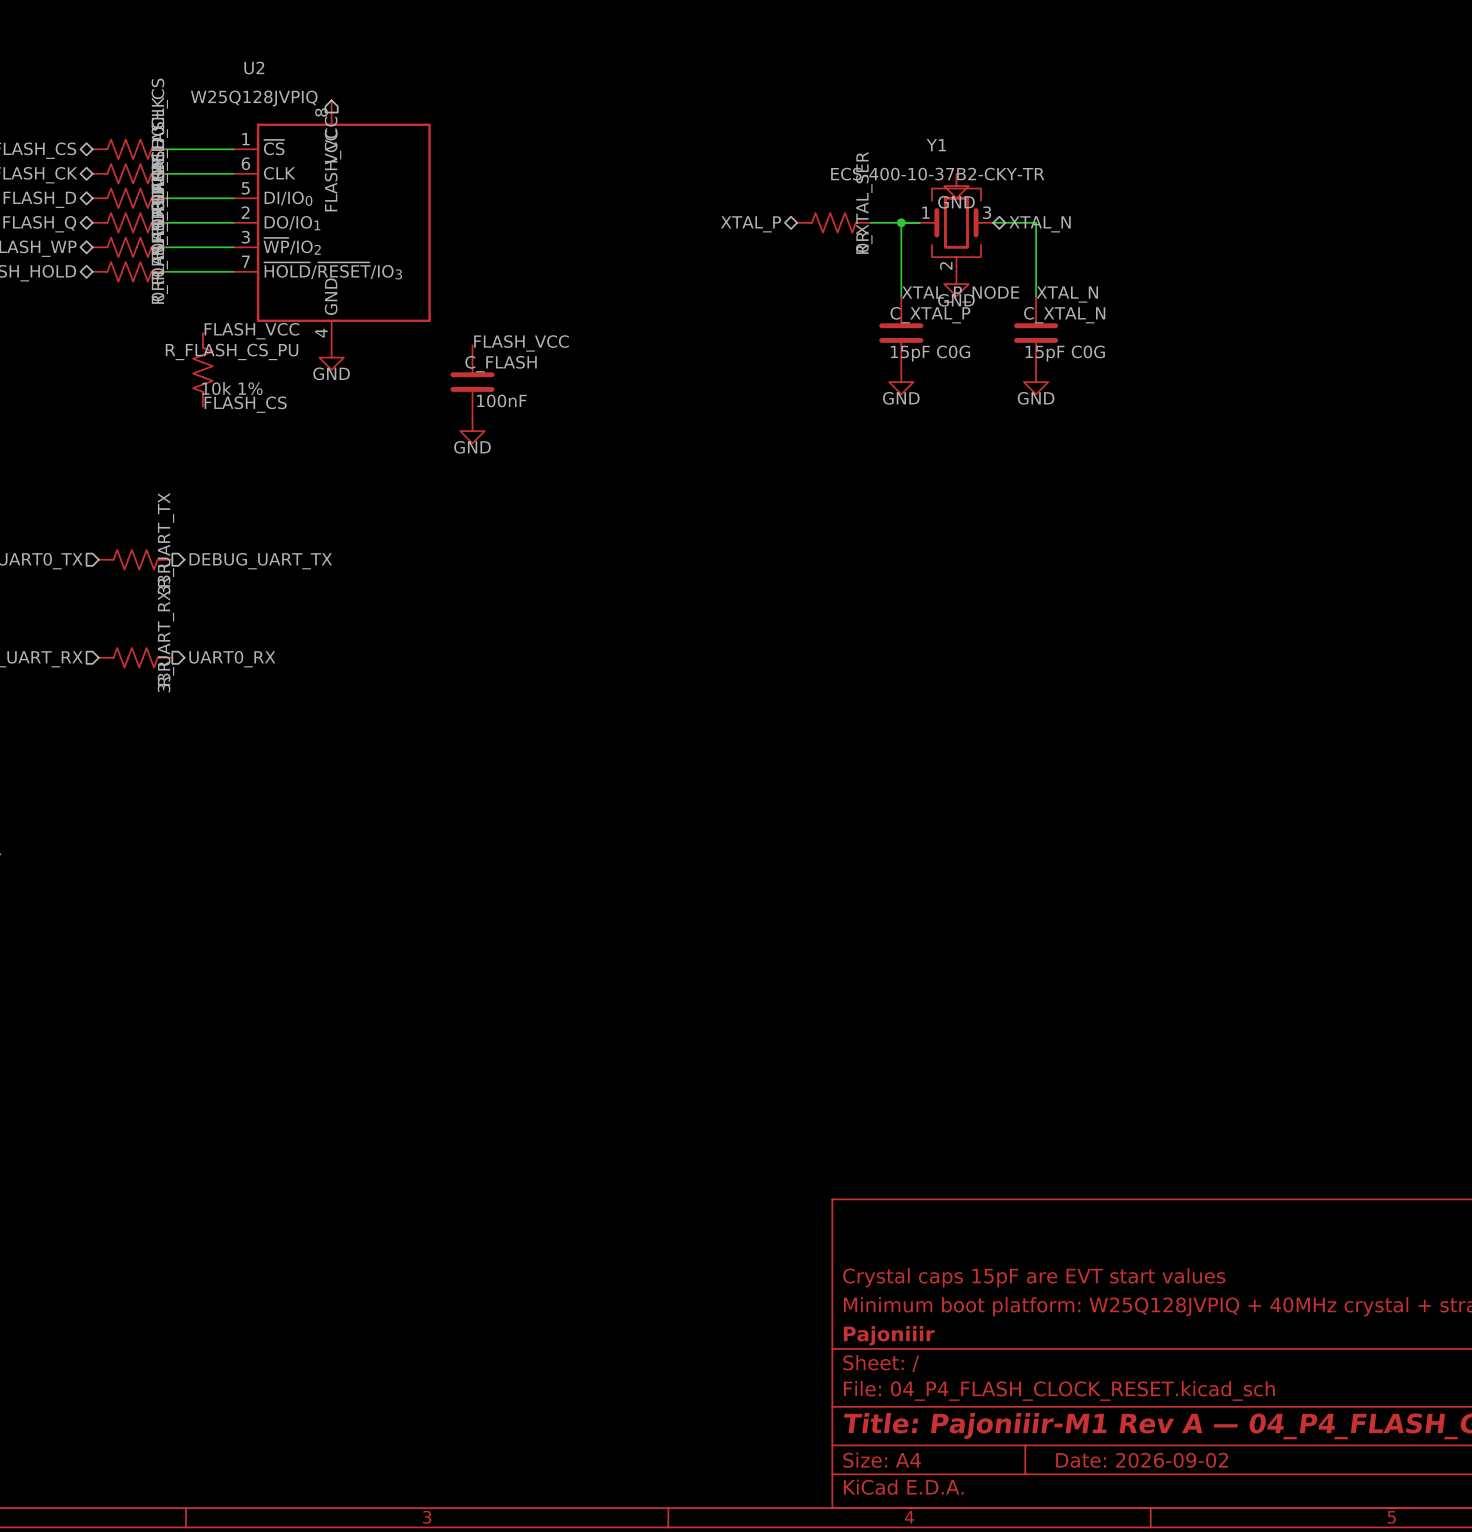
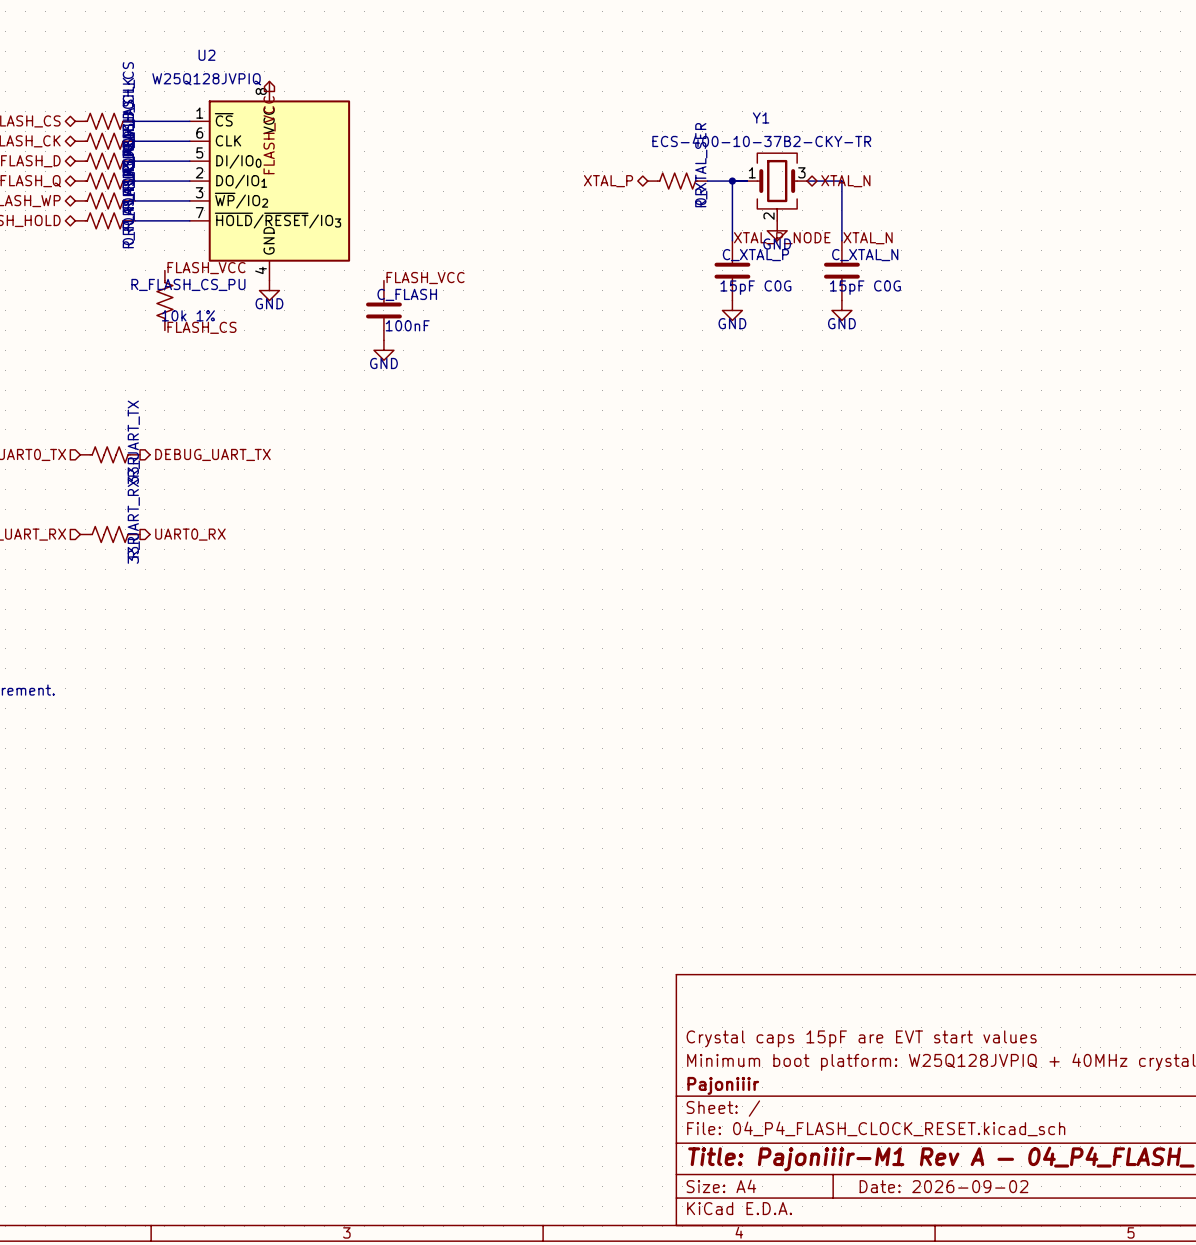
power symbol: GND (956, 186) -> none

